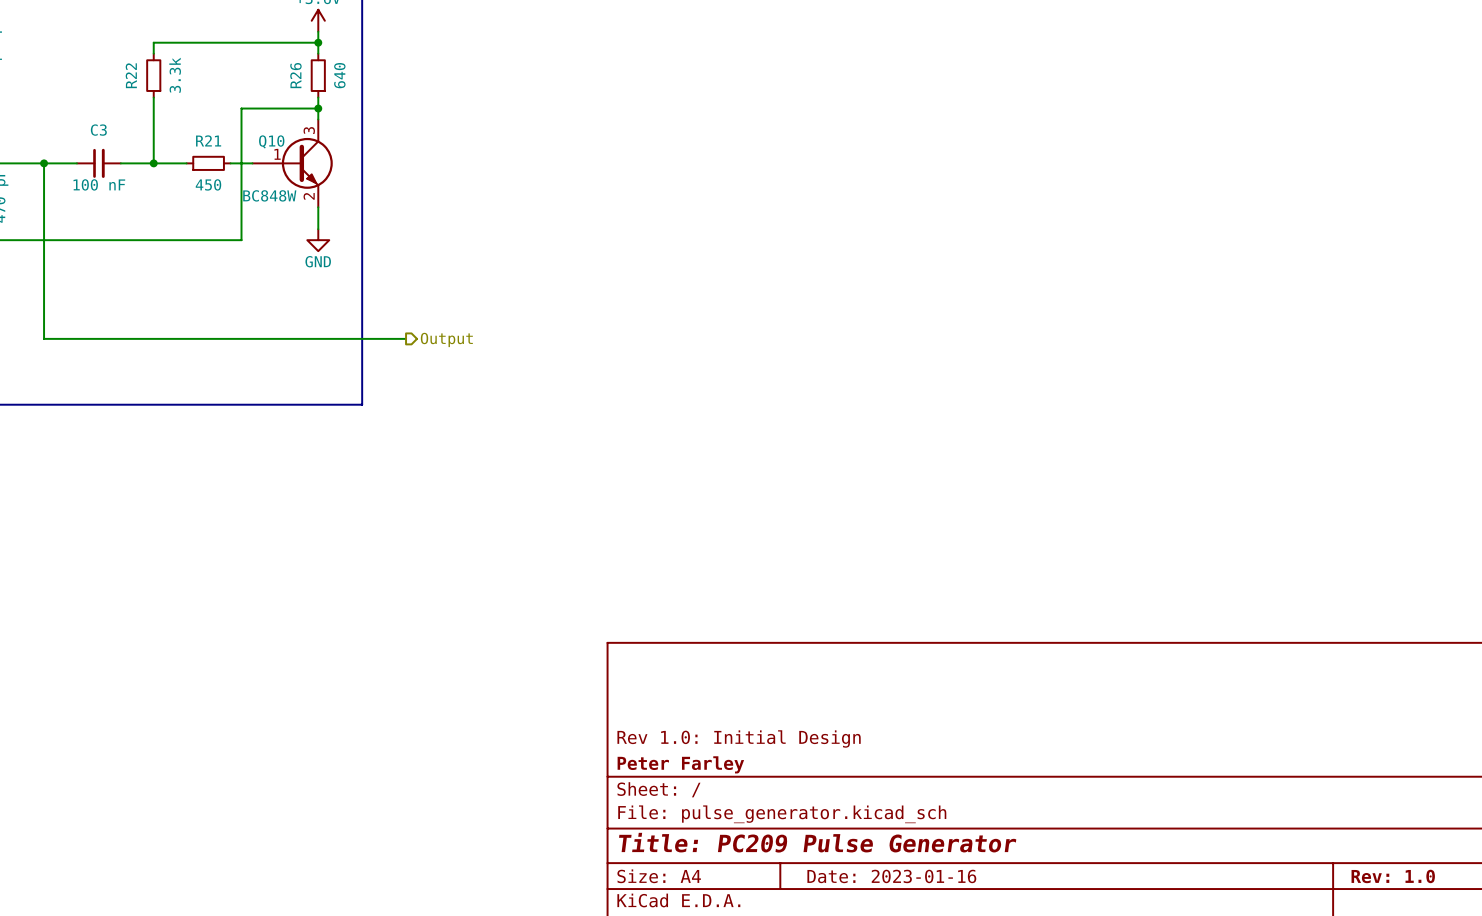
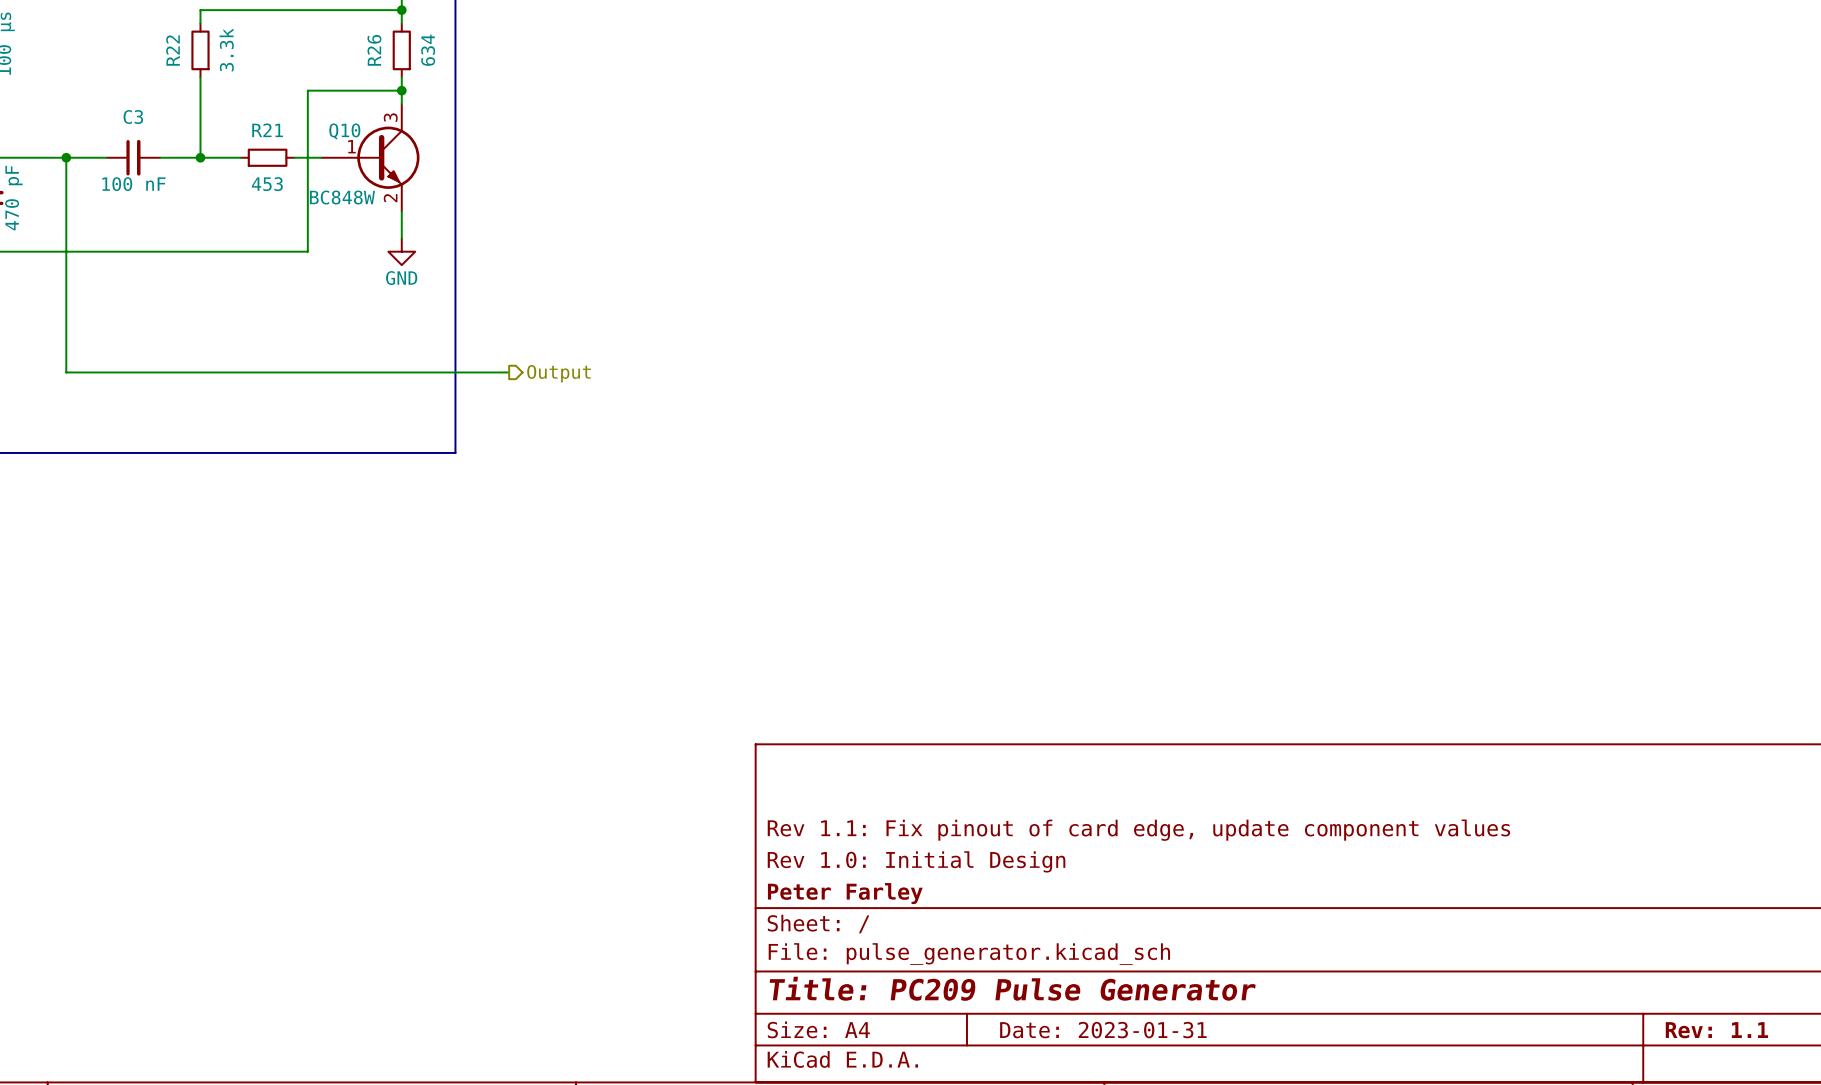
R26 value: 640 (339, 75) -> 634 (428, 50)
R21 value: 450 (208, 184) -> 453 (267, 184)
title block: none -> Rev 1.1: Fix pinout of card edge, update component values (1138, 830)
title block: Date: 2023-01-16 (891, 876) -> Date: 2023-01-31 (1103, 1030)
title block: Rev: 1.0 (1393, 876) -> Rev: 1.1 (1716, 1030)

